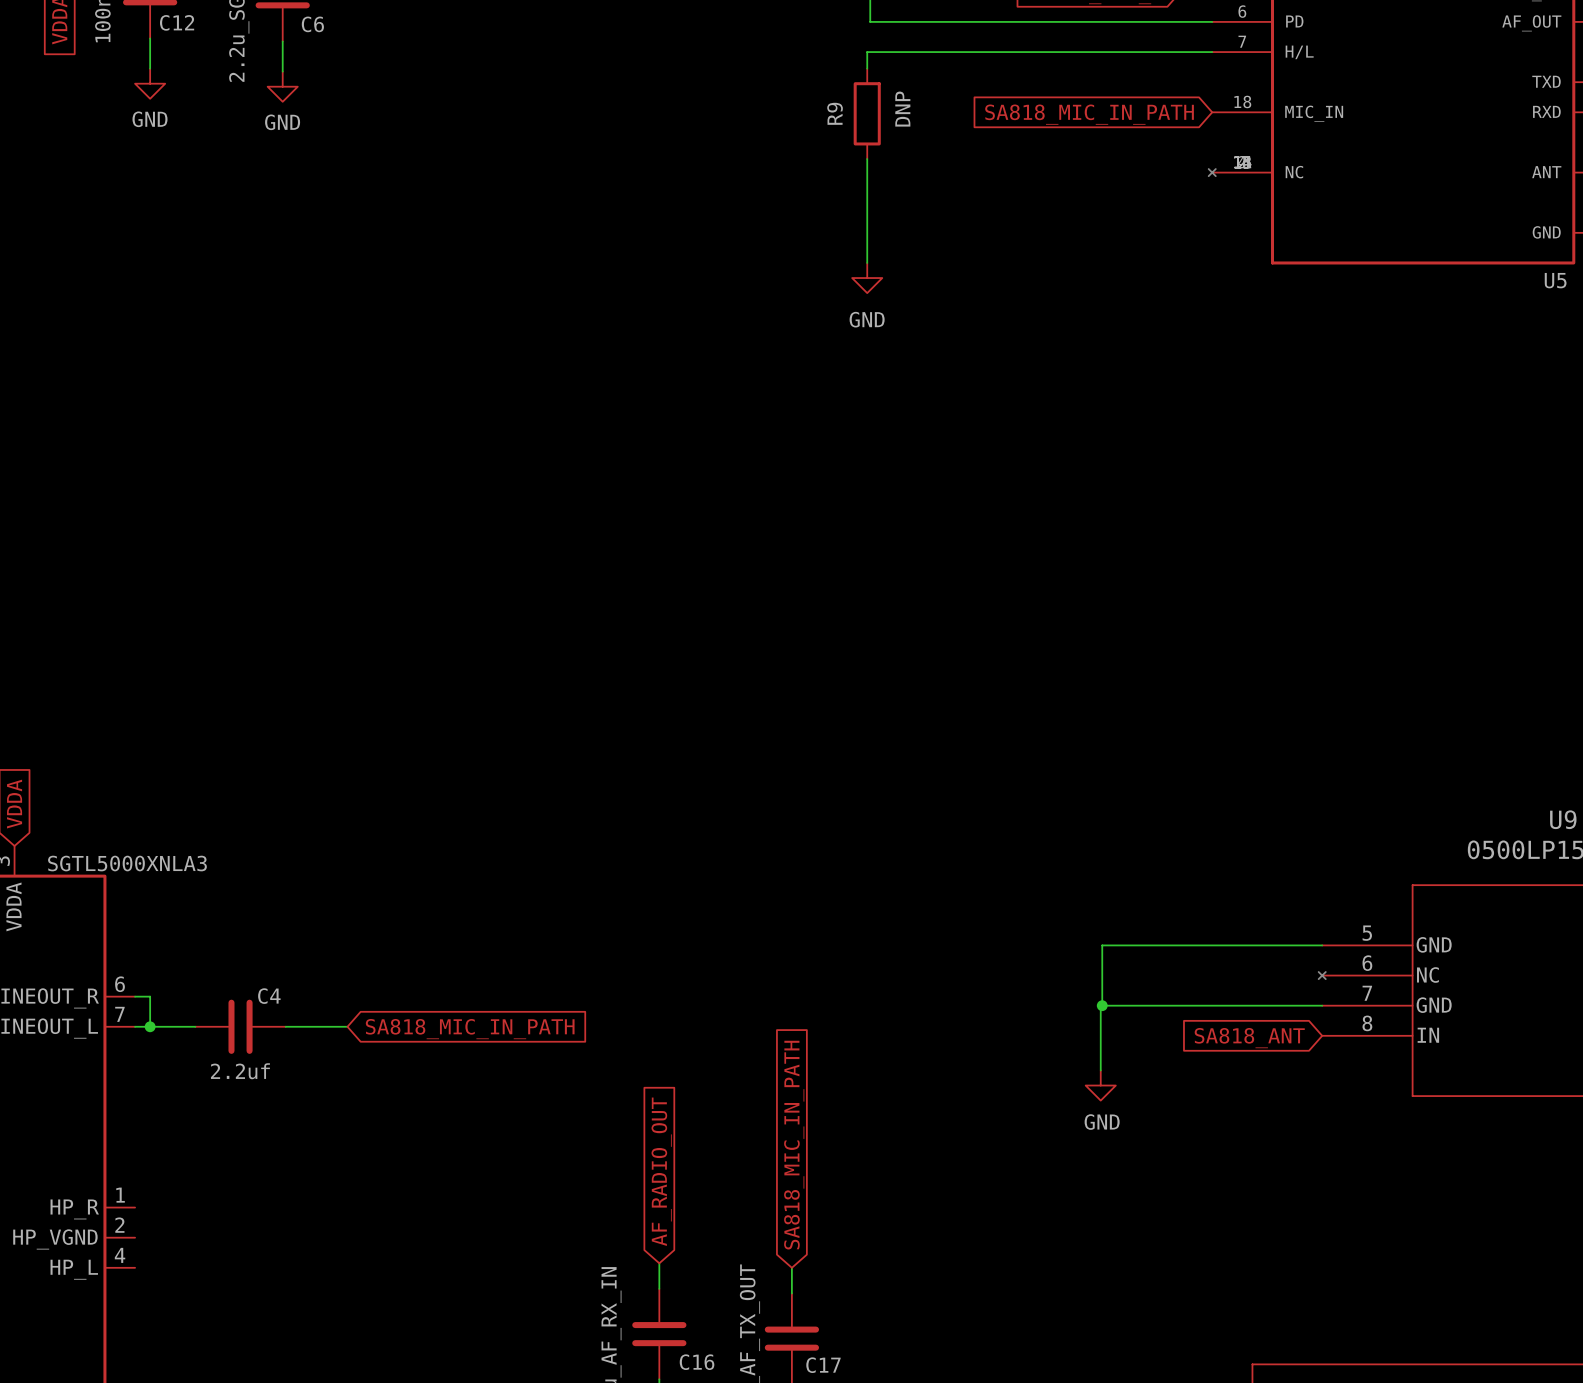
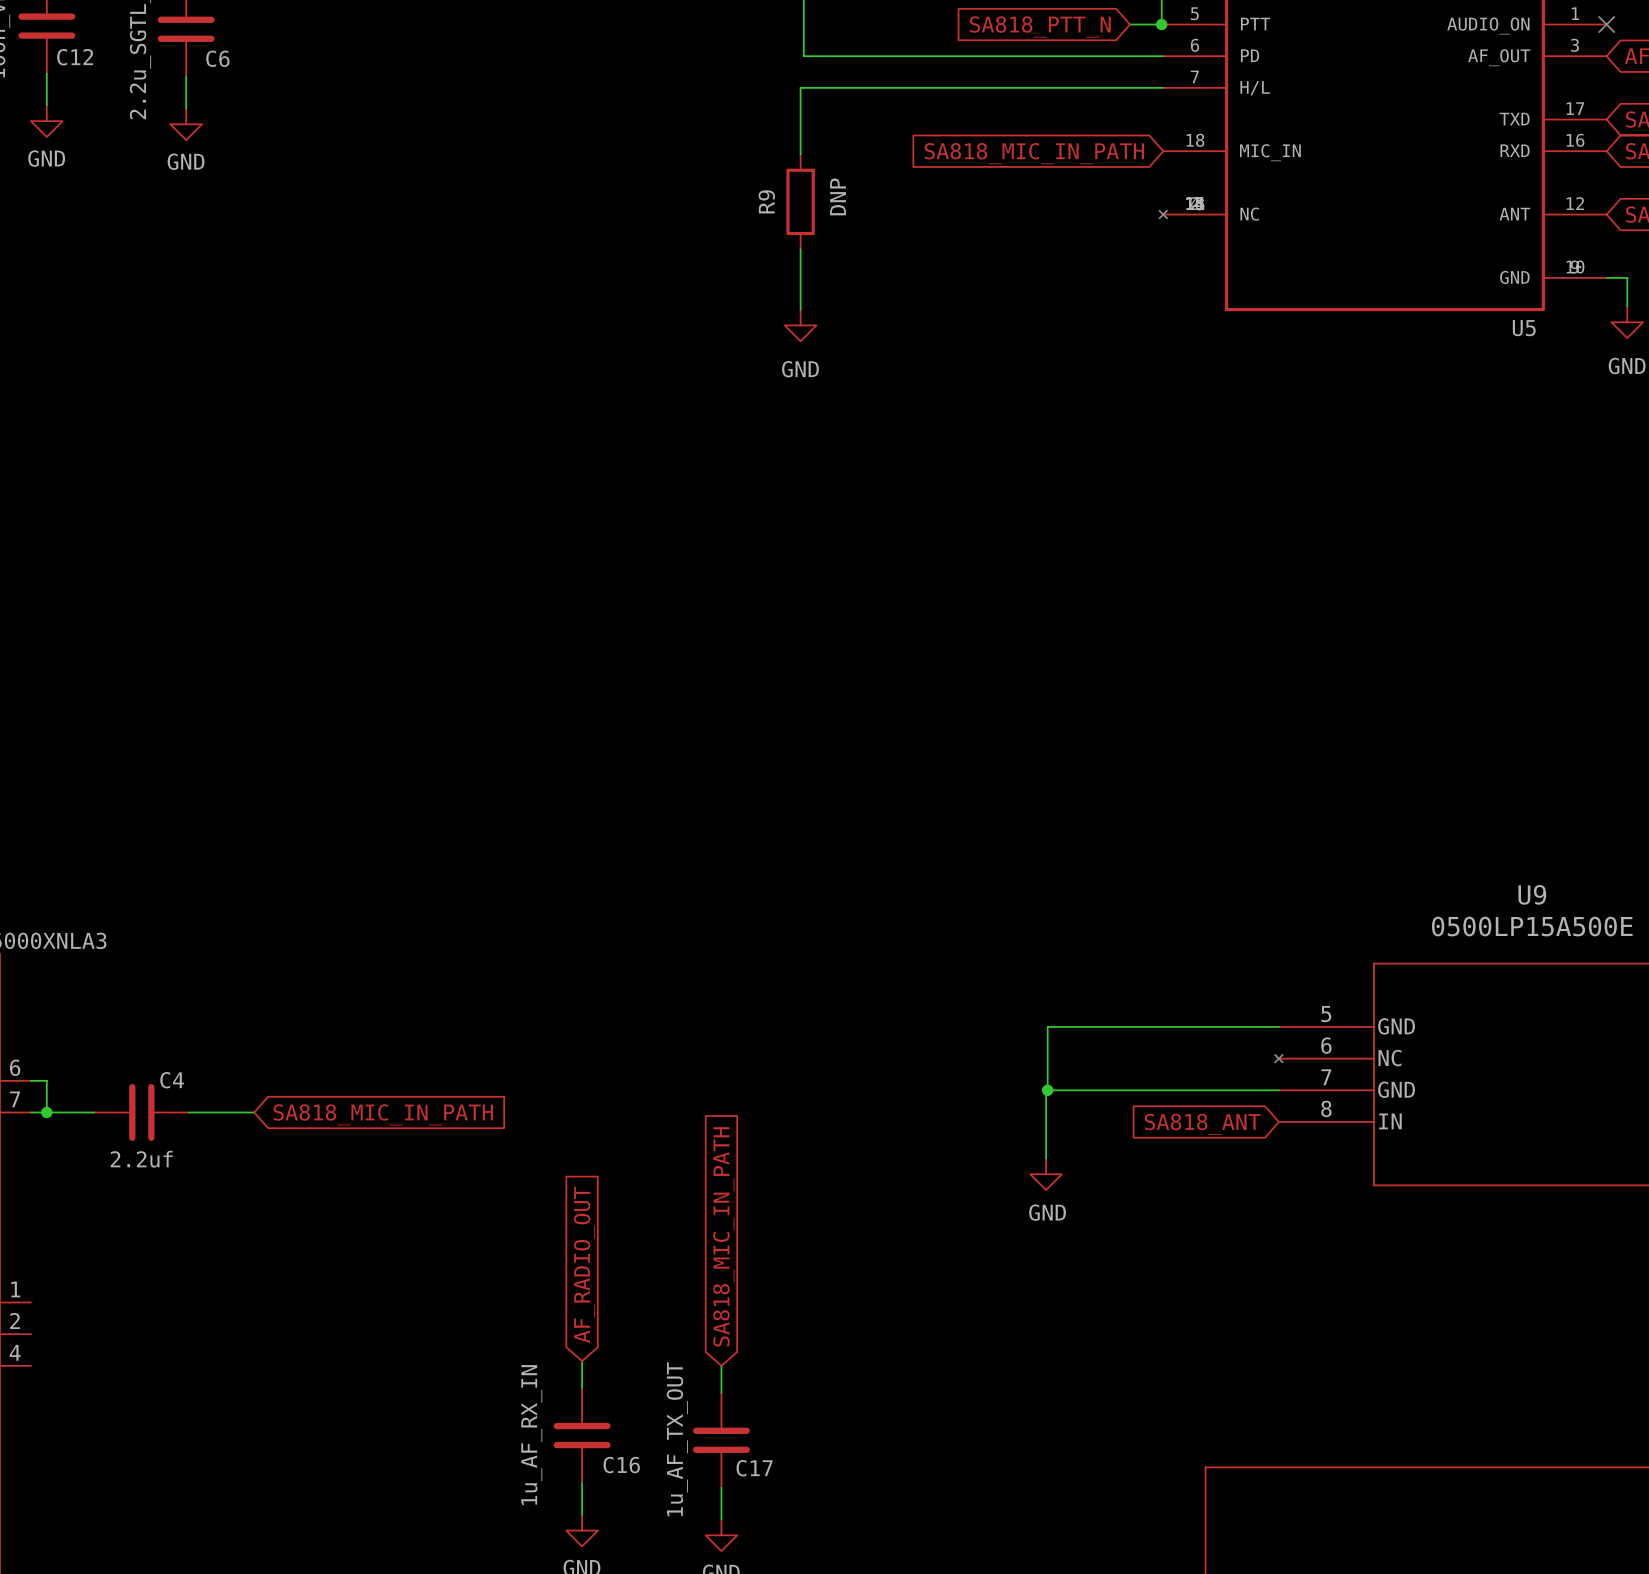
R9 position: (867, 113) -> (800, 201)
wire: (867, 159) (867, 205) -> (800, 105) (800, 154)

